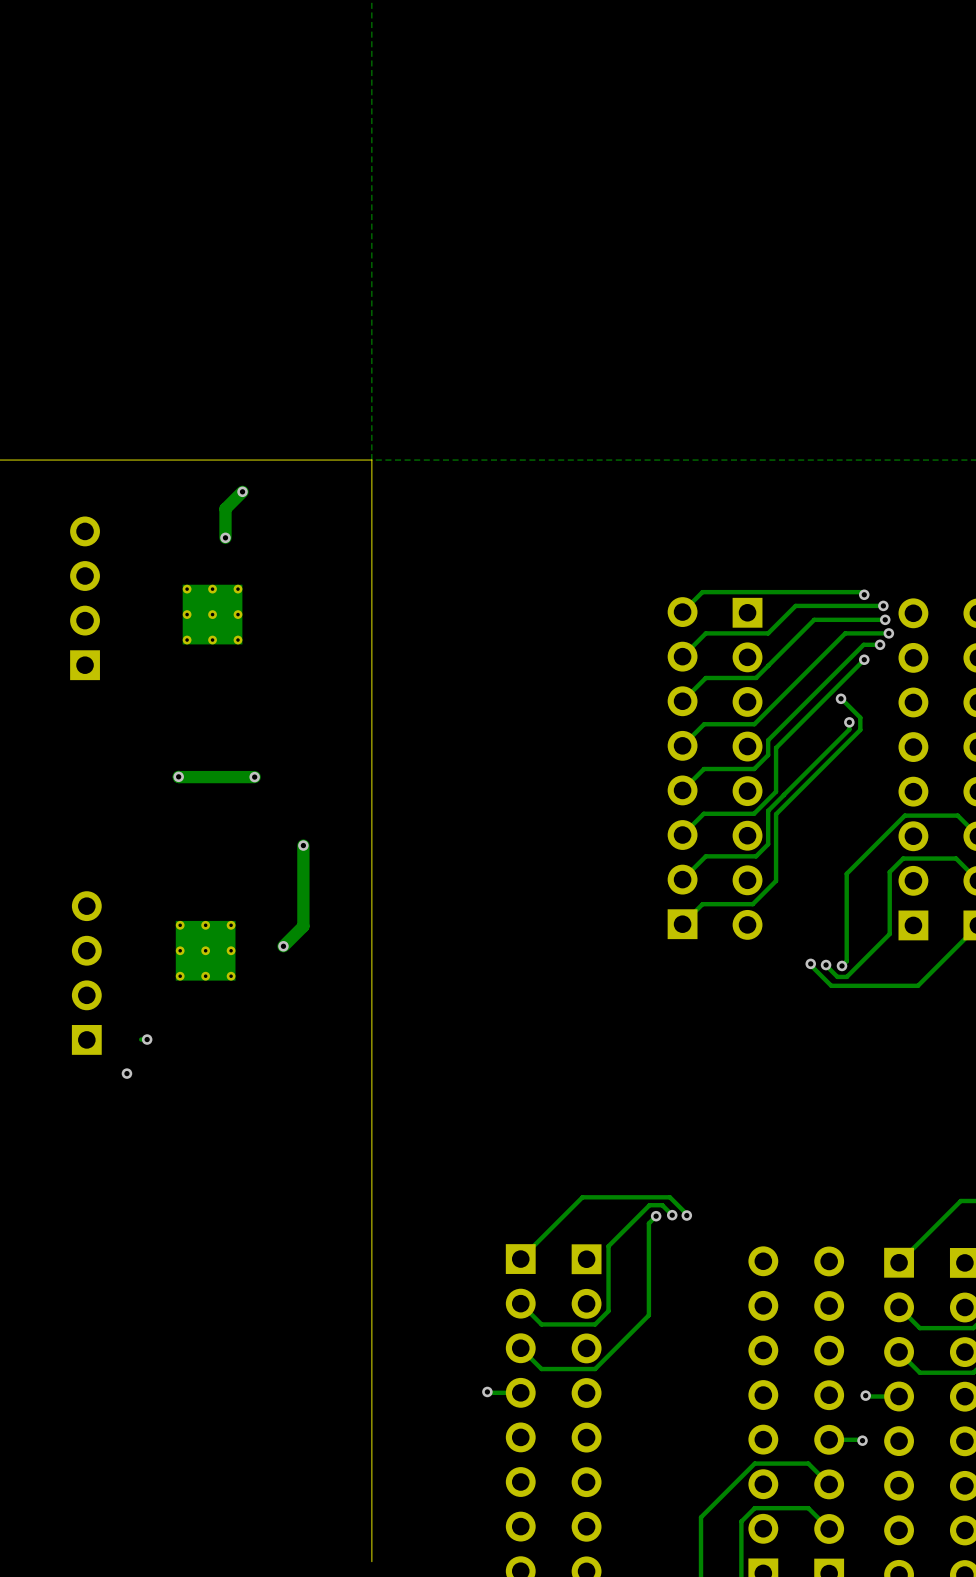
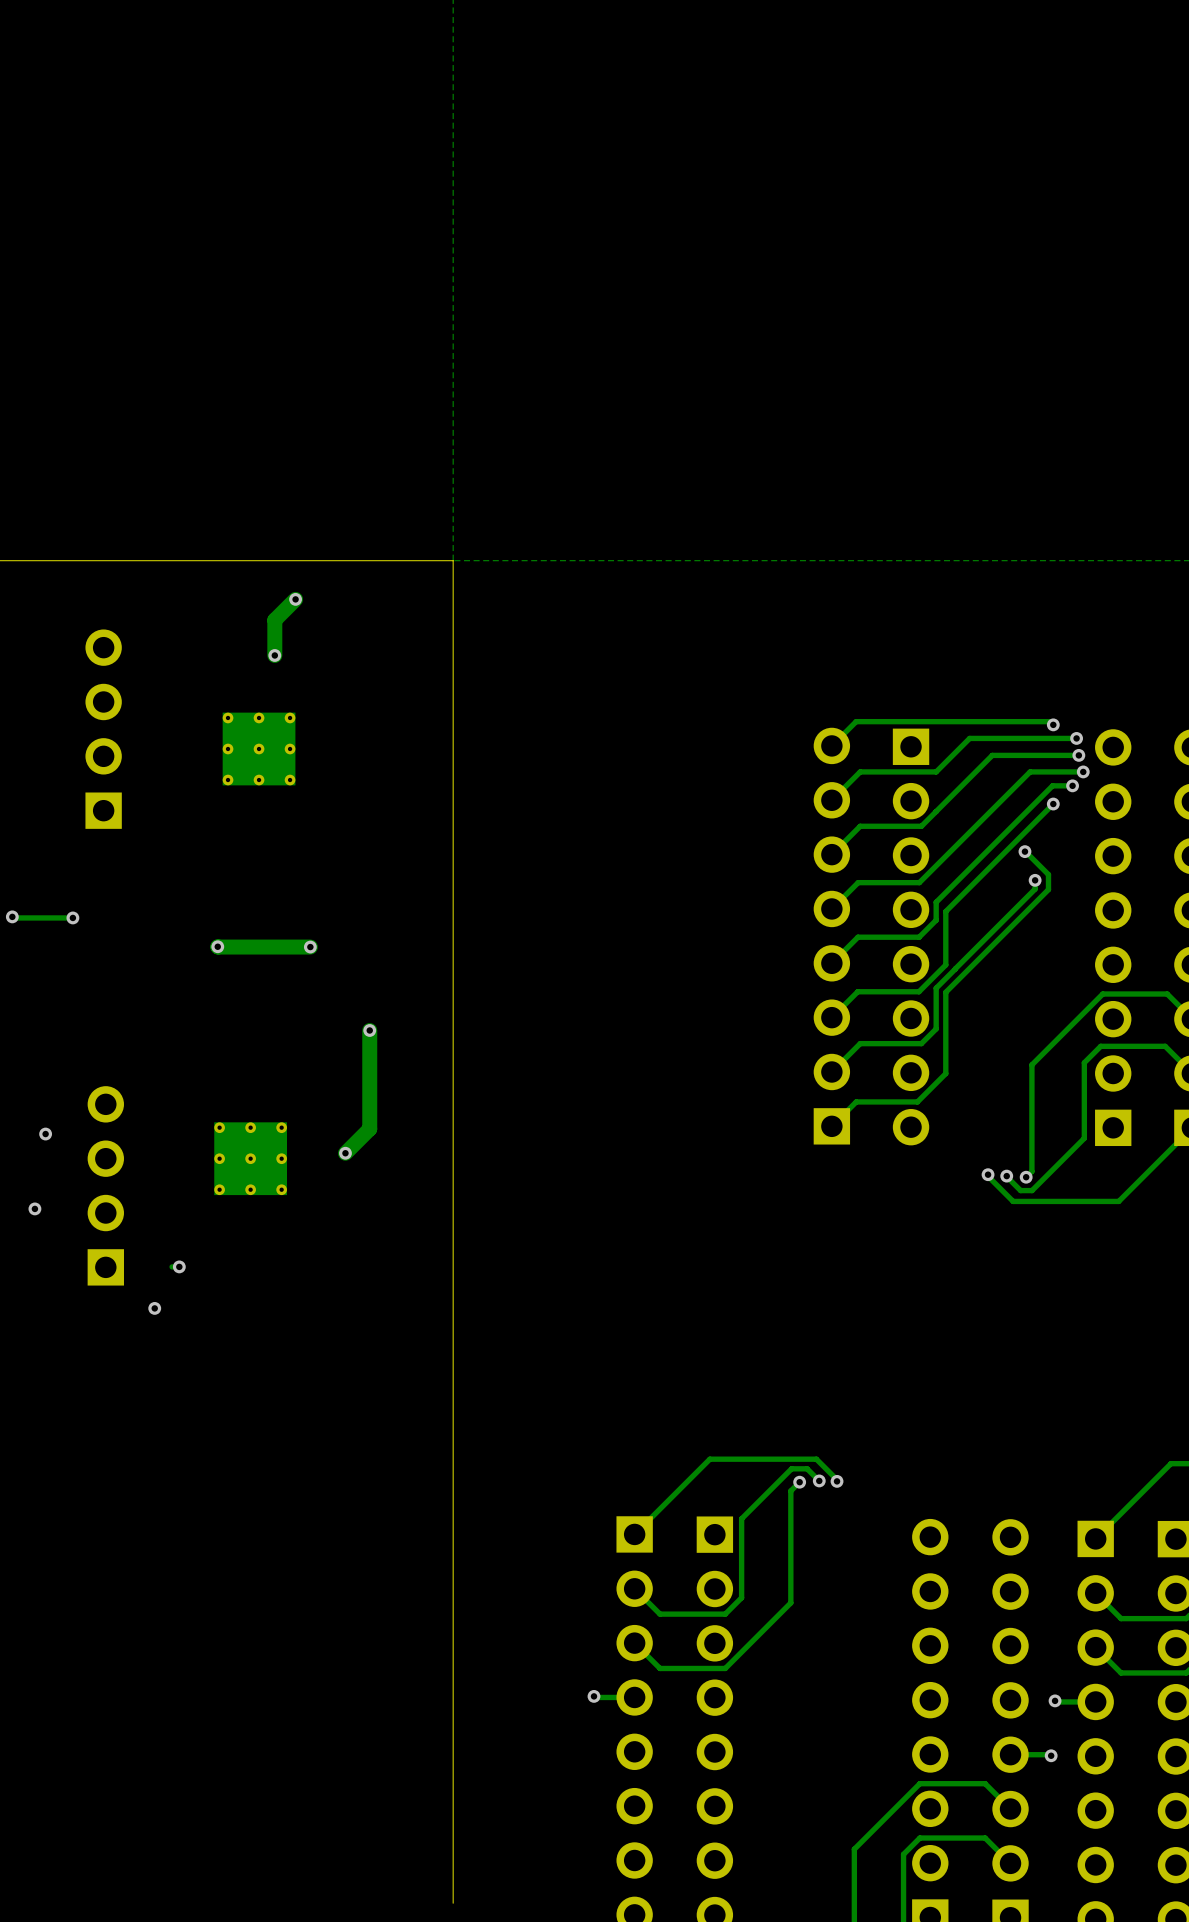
track: none -> (12, 916) (72, 917)
via: none -> (12, 916)
via: none -> (72, 917)
via: none -> (45, 1134)
via: none -> (34, 1208)

